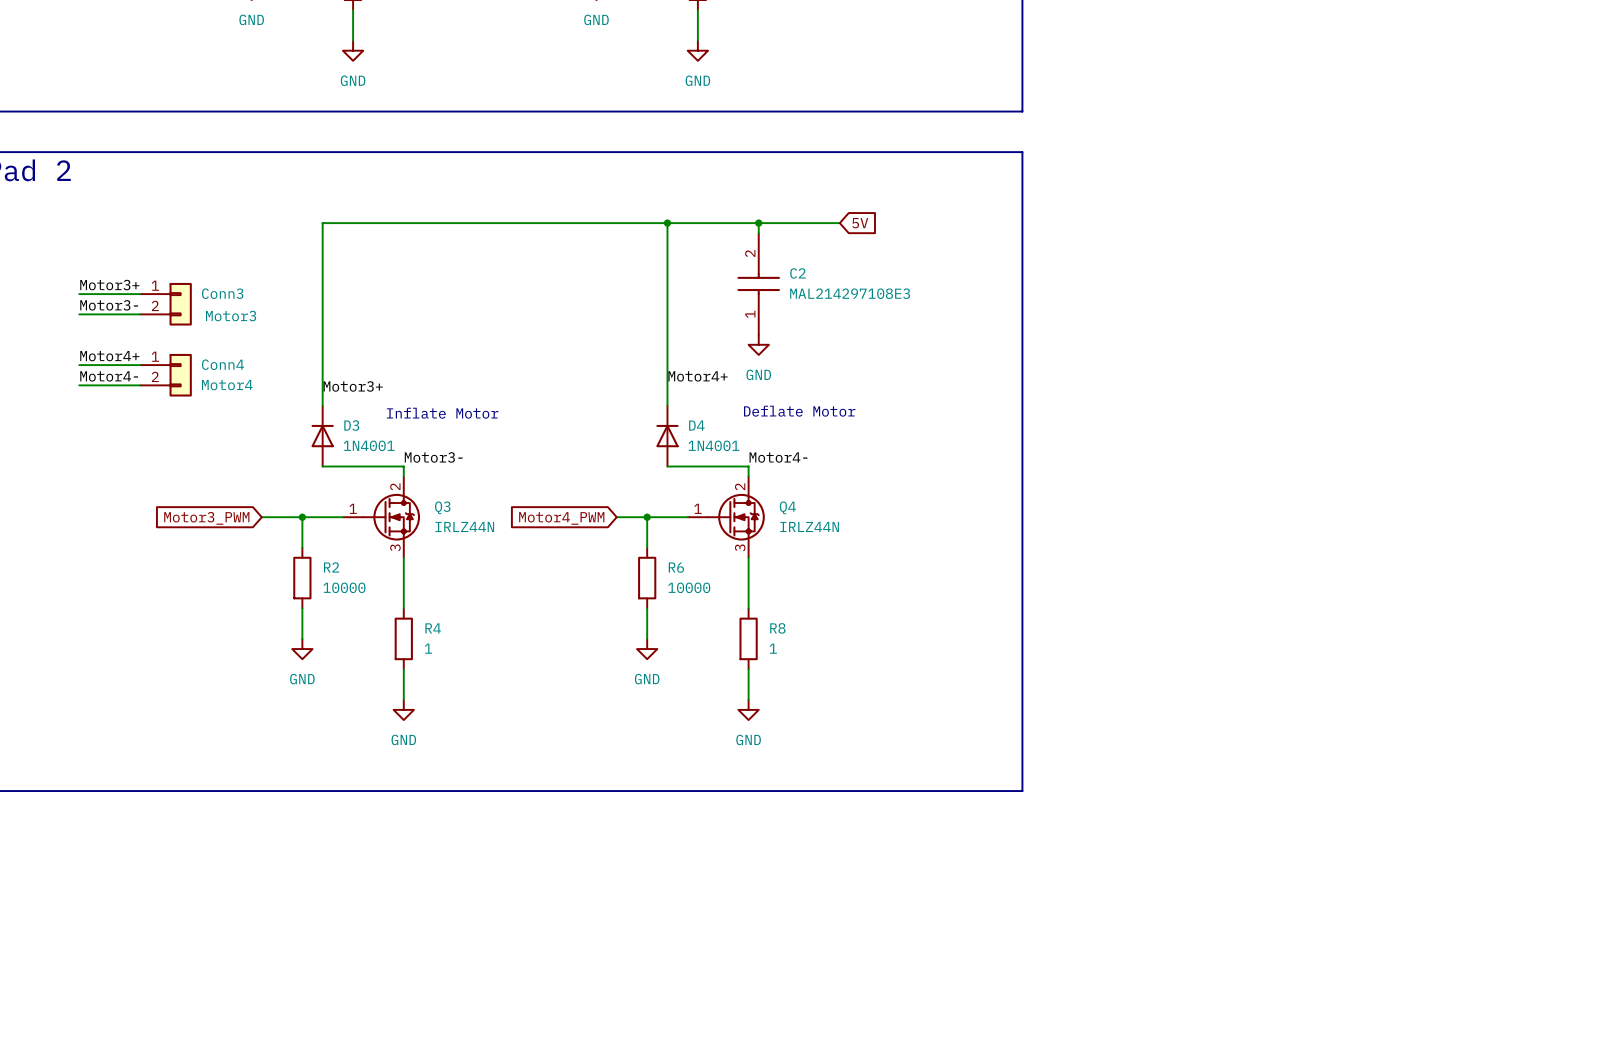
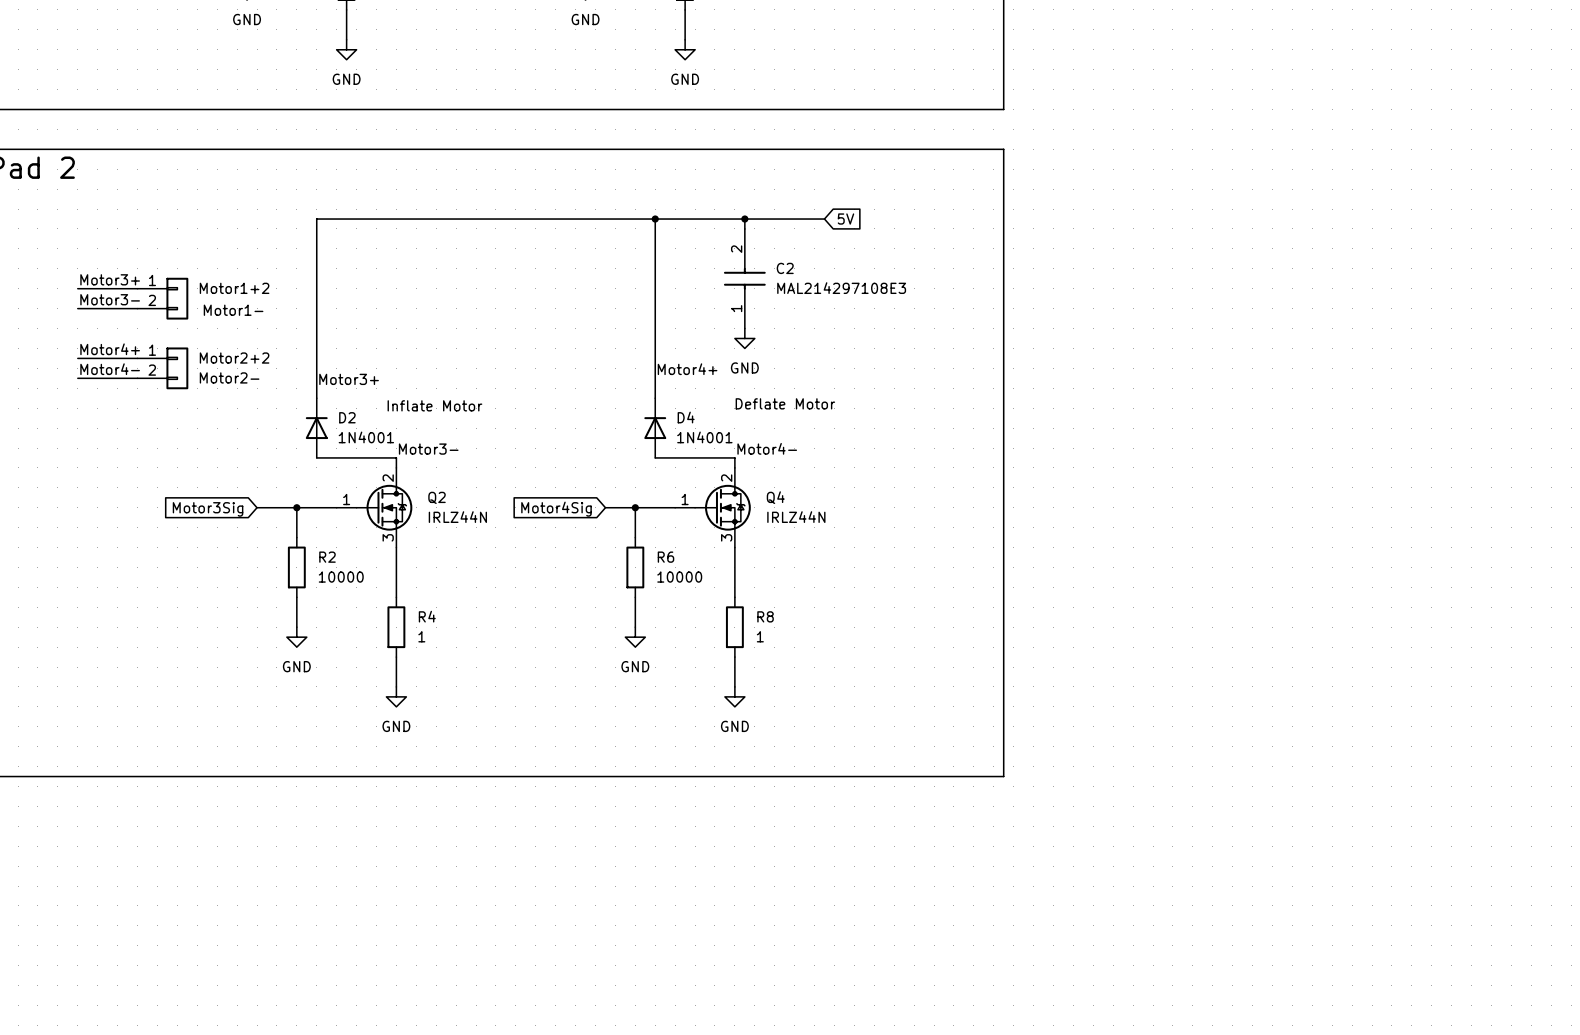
Conn3 name: Conn3 (222, 293) -> Motor1+2 (234, 288)
Conn3 value: Motor3 (231, 316) -> Motor1- (233, 310)
Conn4 name: Conn4 (222, 364) -> Motor2+2 (234, 358)
Conn4 value: Motor4 (227, 385) -> Motor2- (229, 377)
D3 name: D3 (351, 425) -> D2 (347, 417)
Q3 name: Q3 (442, 507) -> Q2 (437, 497)
global label: Motor3_PWM (206, 518) -> Motor3Sig (208, 509)
global label: Motor4_PWM (561, 518) -> Motor4Sig (556, 509)

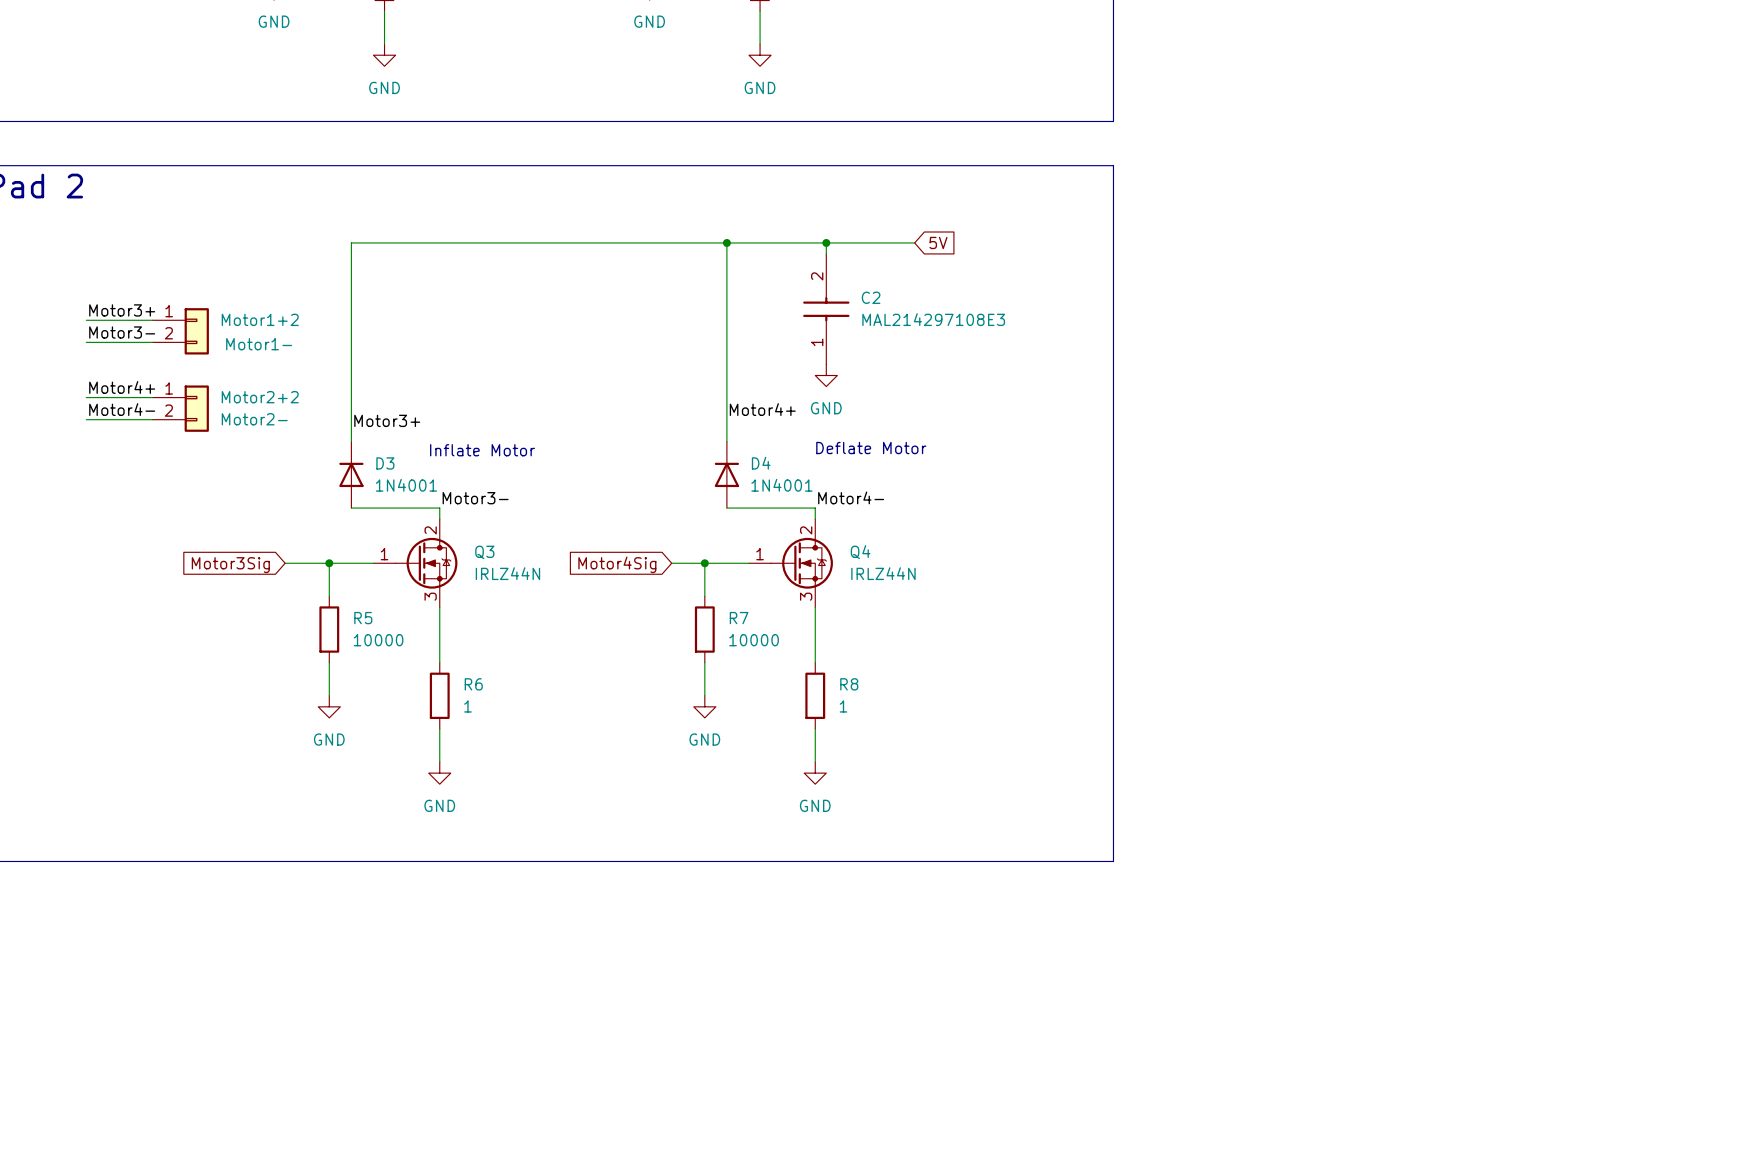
D2 name: D2 (347, 417) -> D3 (385, 463)
Q2 name: Q2 (437, 497) -> Q3 (484, 552)
R2 name: R2 (327, 557) -> R5 (363, 618)
R6 name: R6 (665, 557) -> R7 (739, 618)
R4 name: R4 (427, 616) -> R6 (473, 684)

